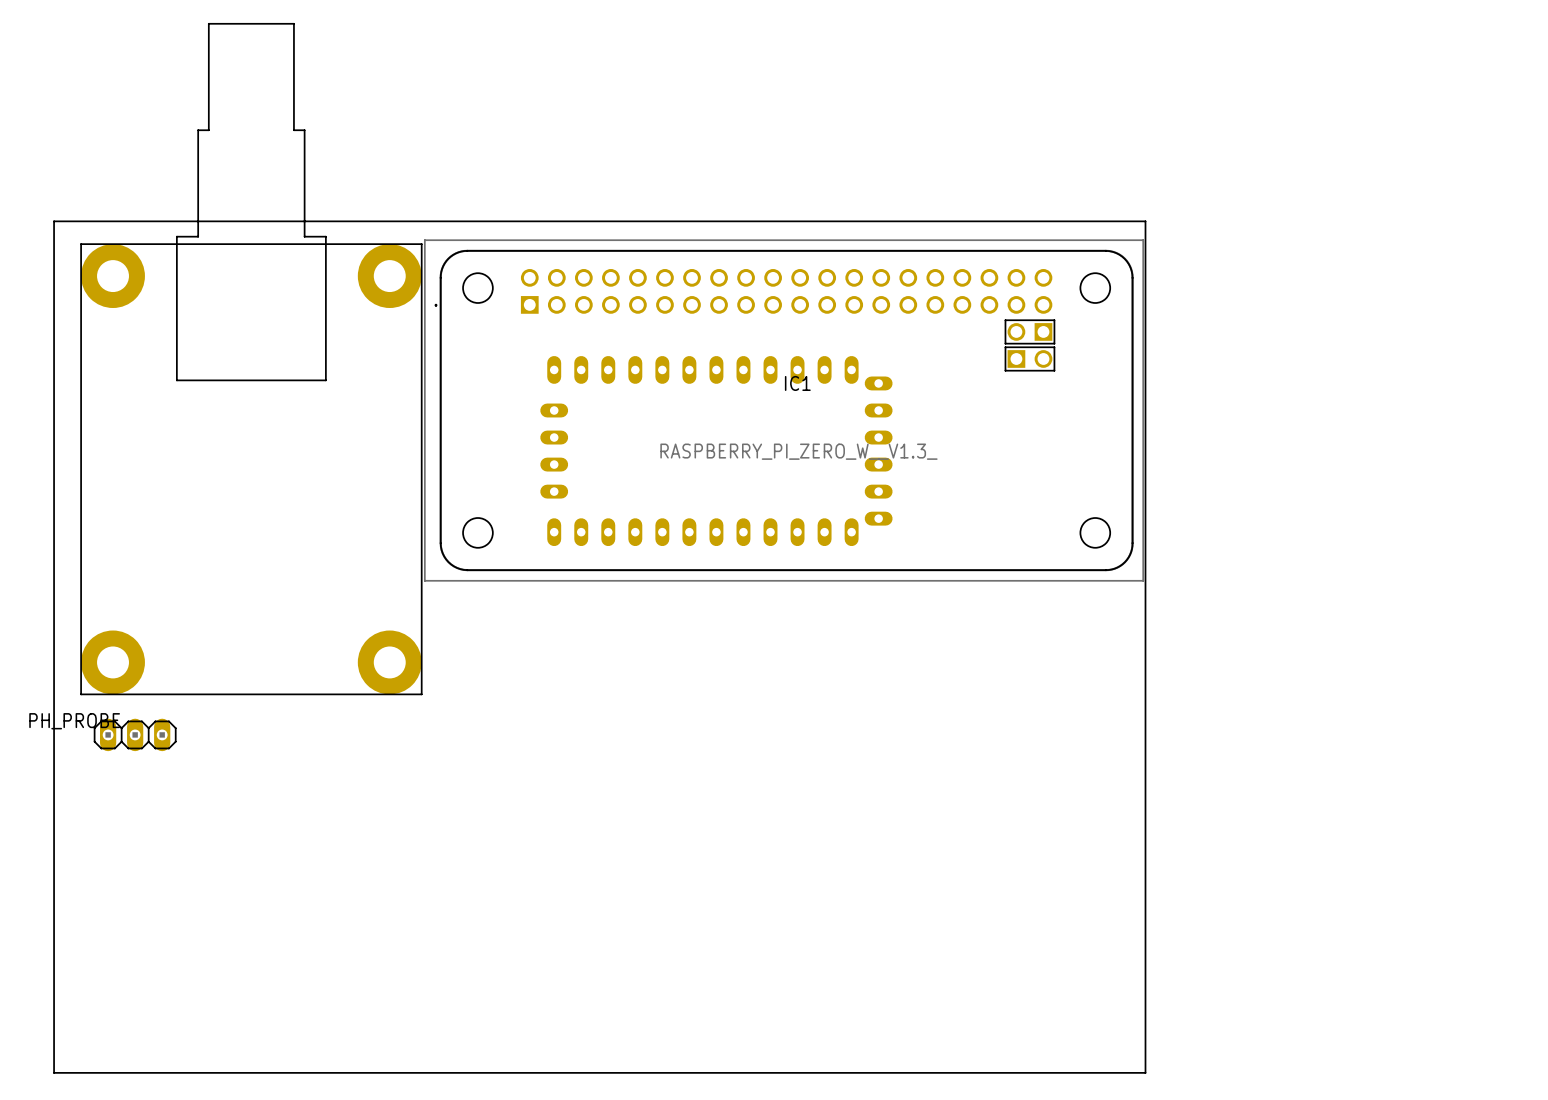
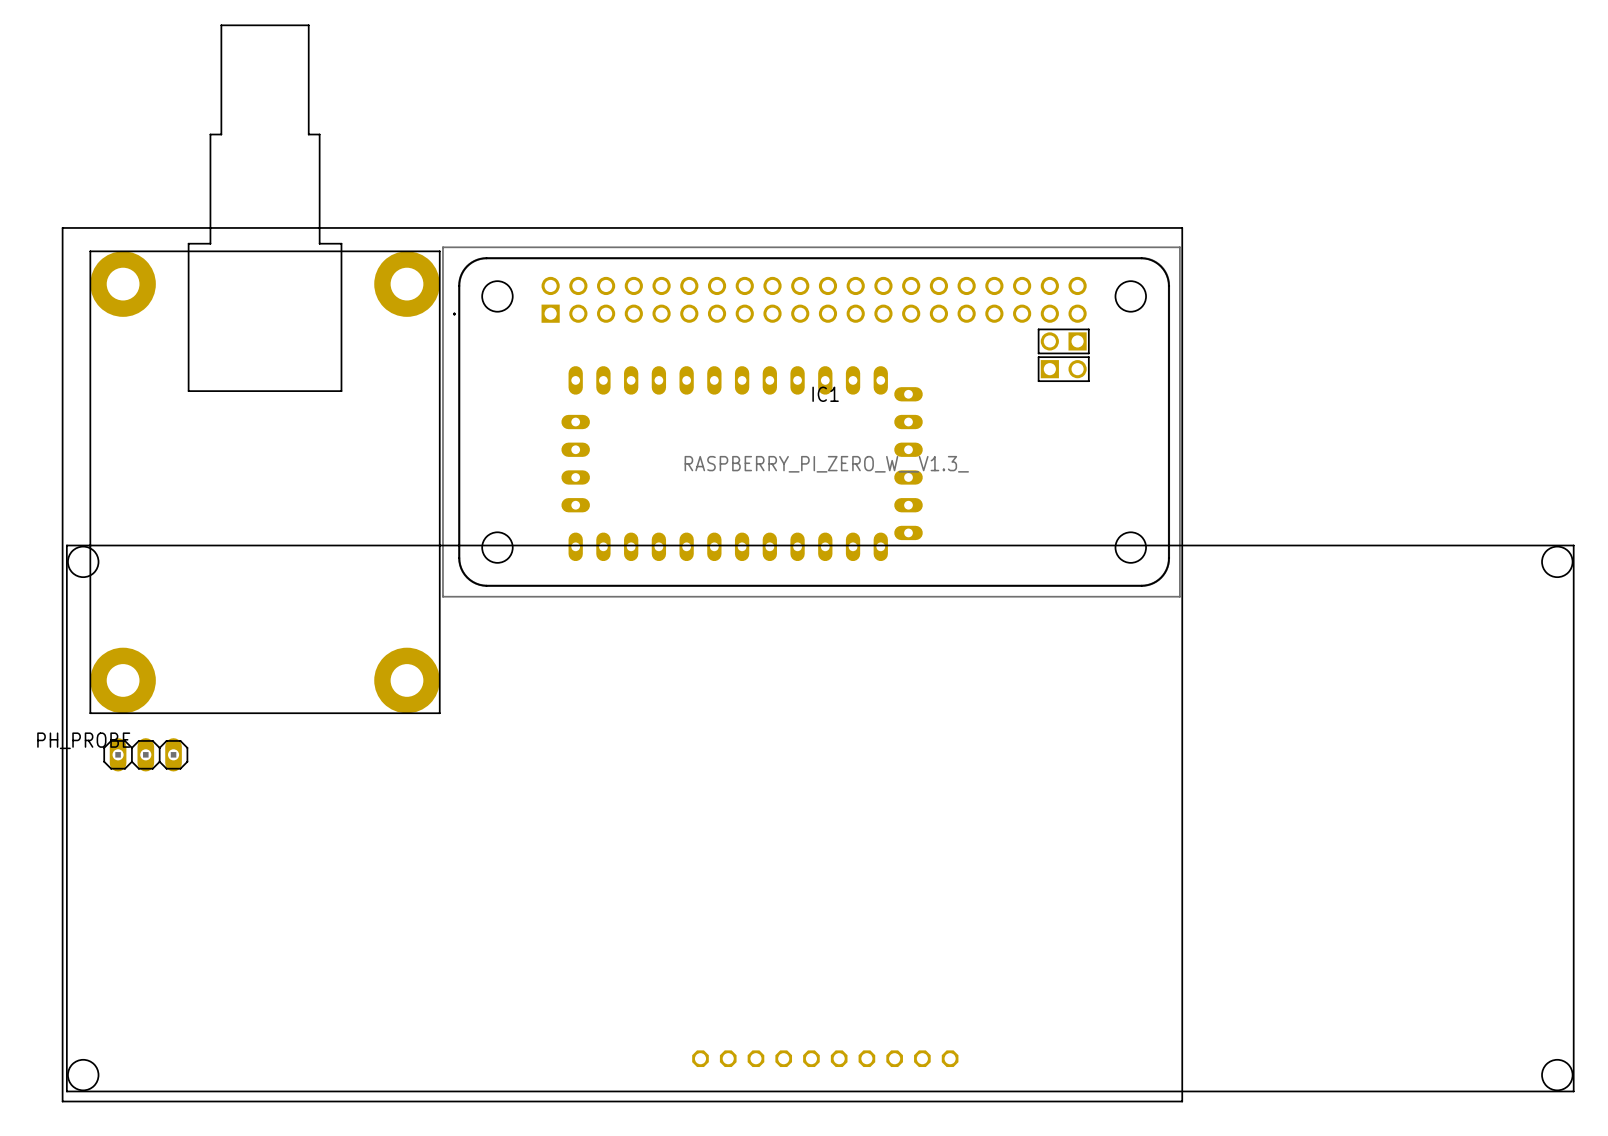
part: none -> (820, 818)

